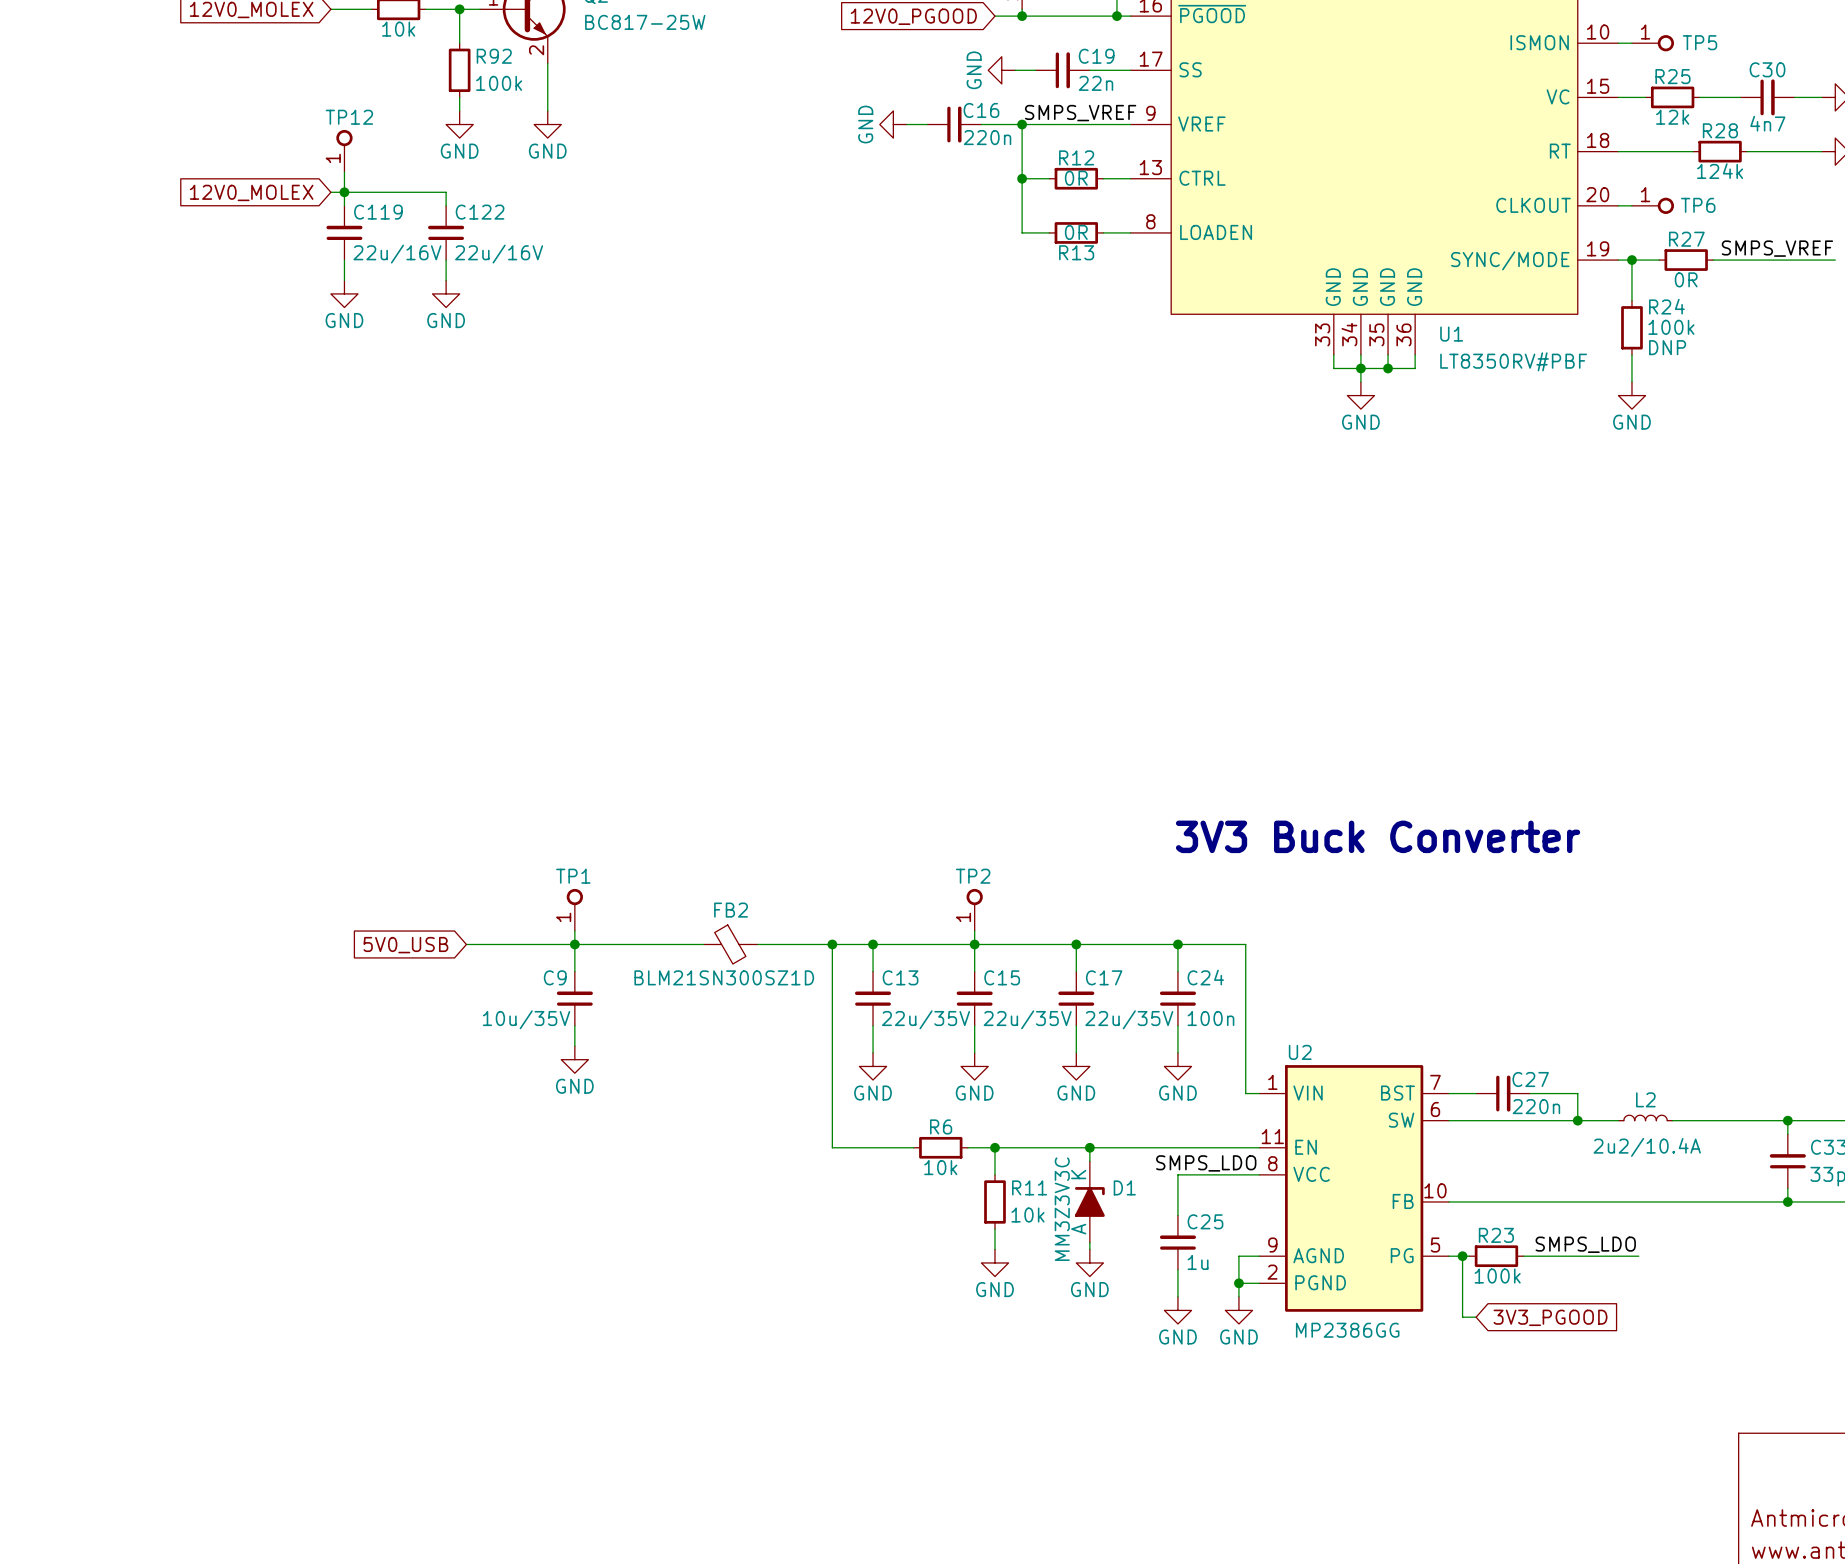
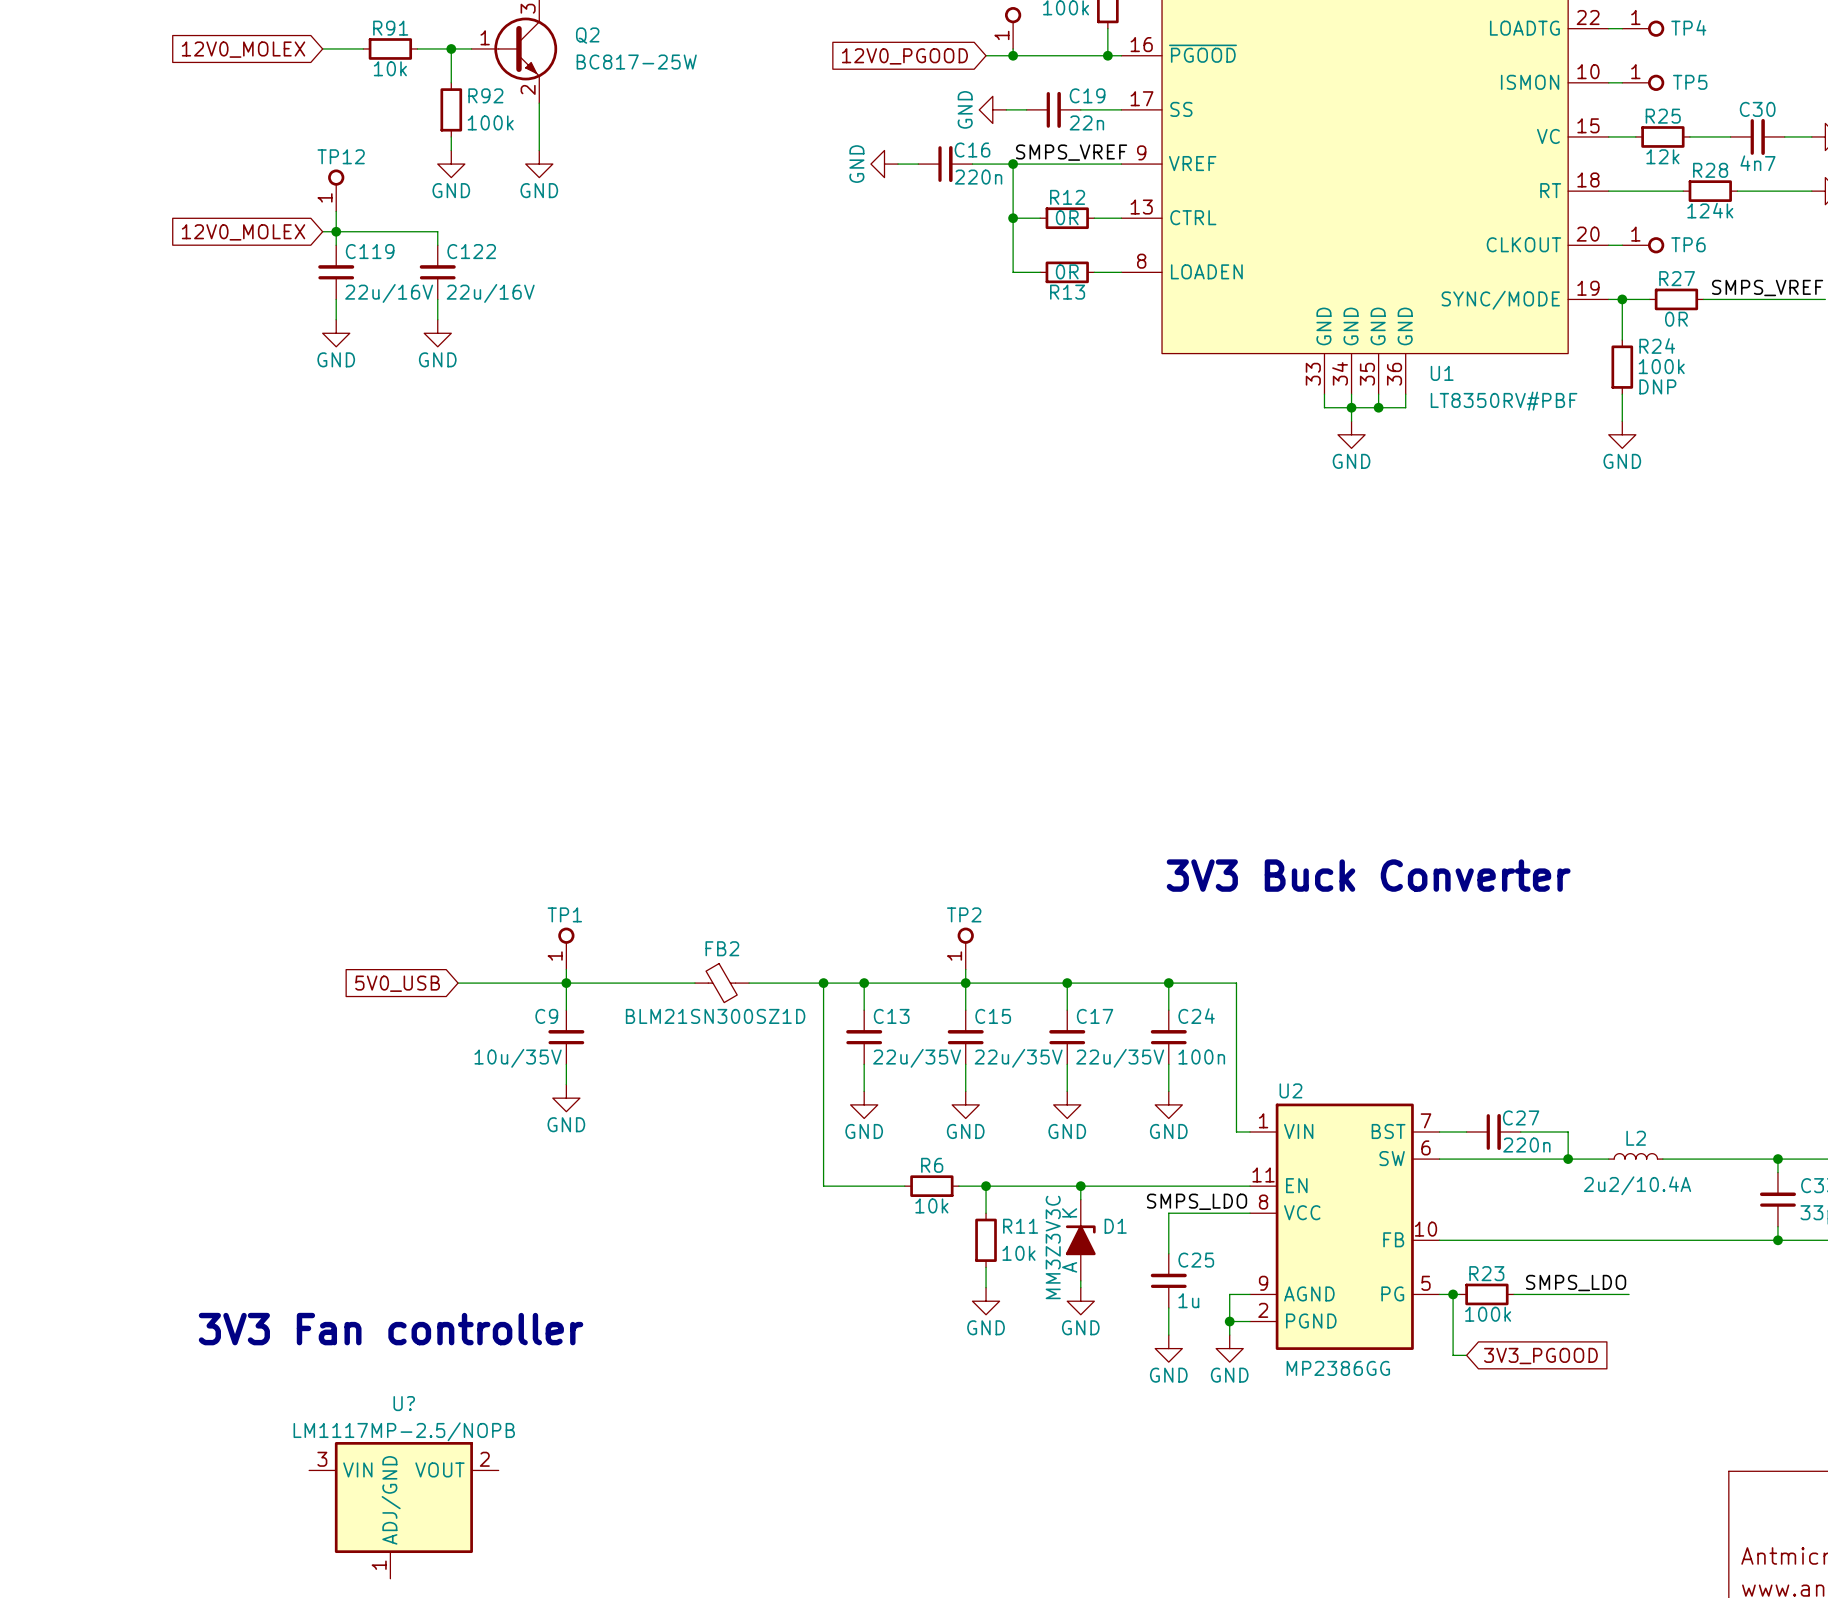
text: none -> 3V3 Fan controller (391, 1329)
U?: none -> (403, 1510)

